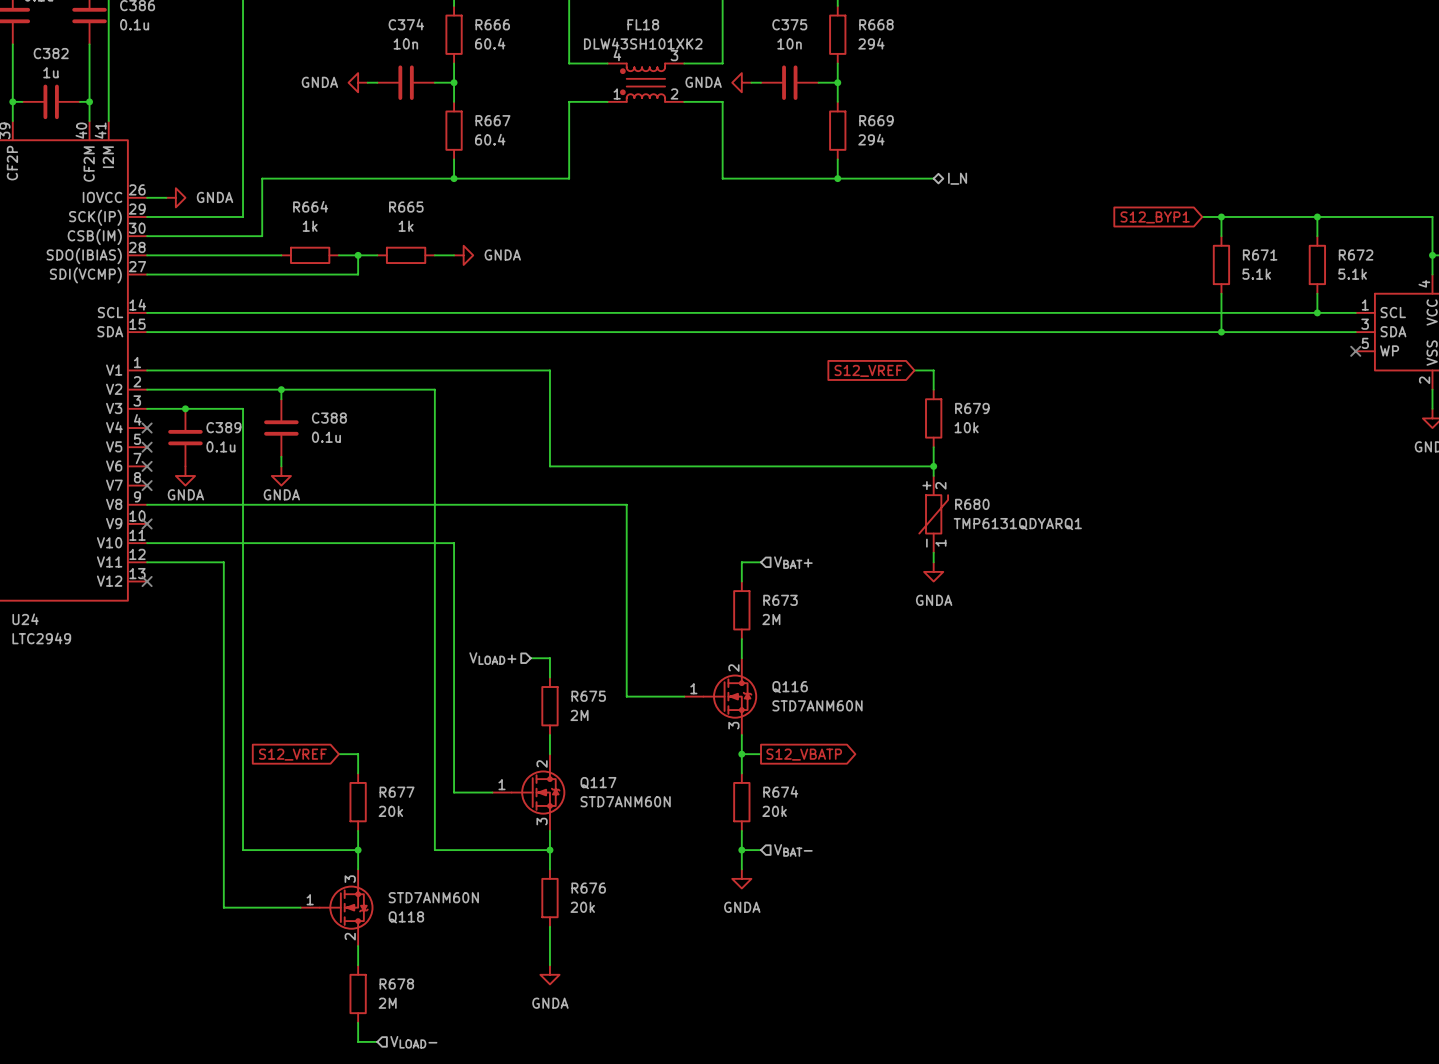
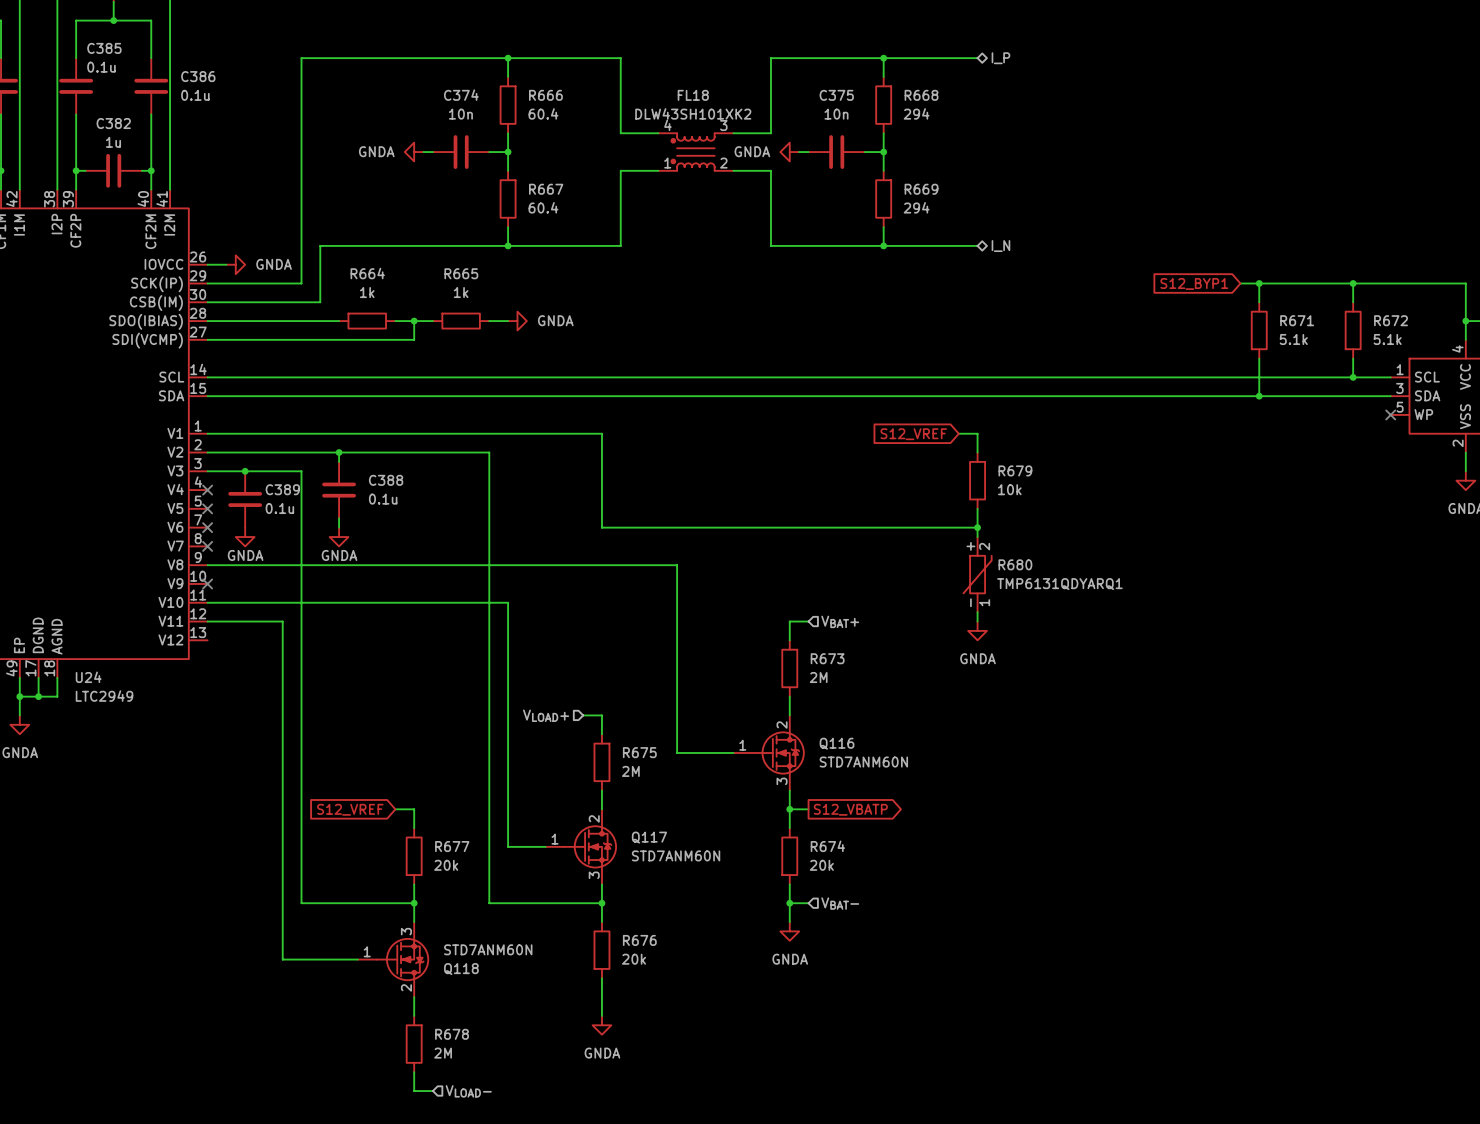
no-connect mark: (147, 581) -> none

